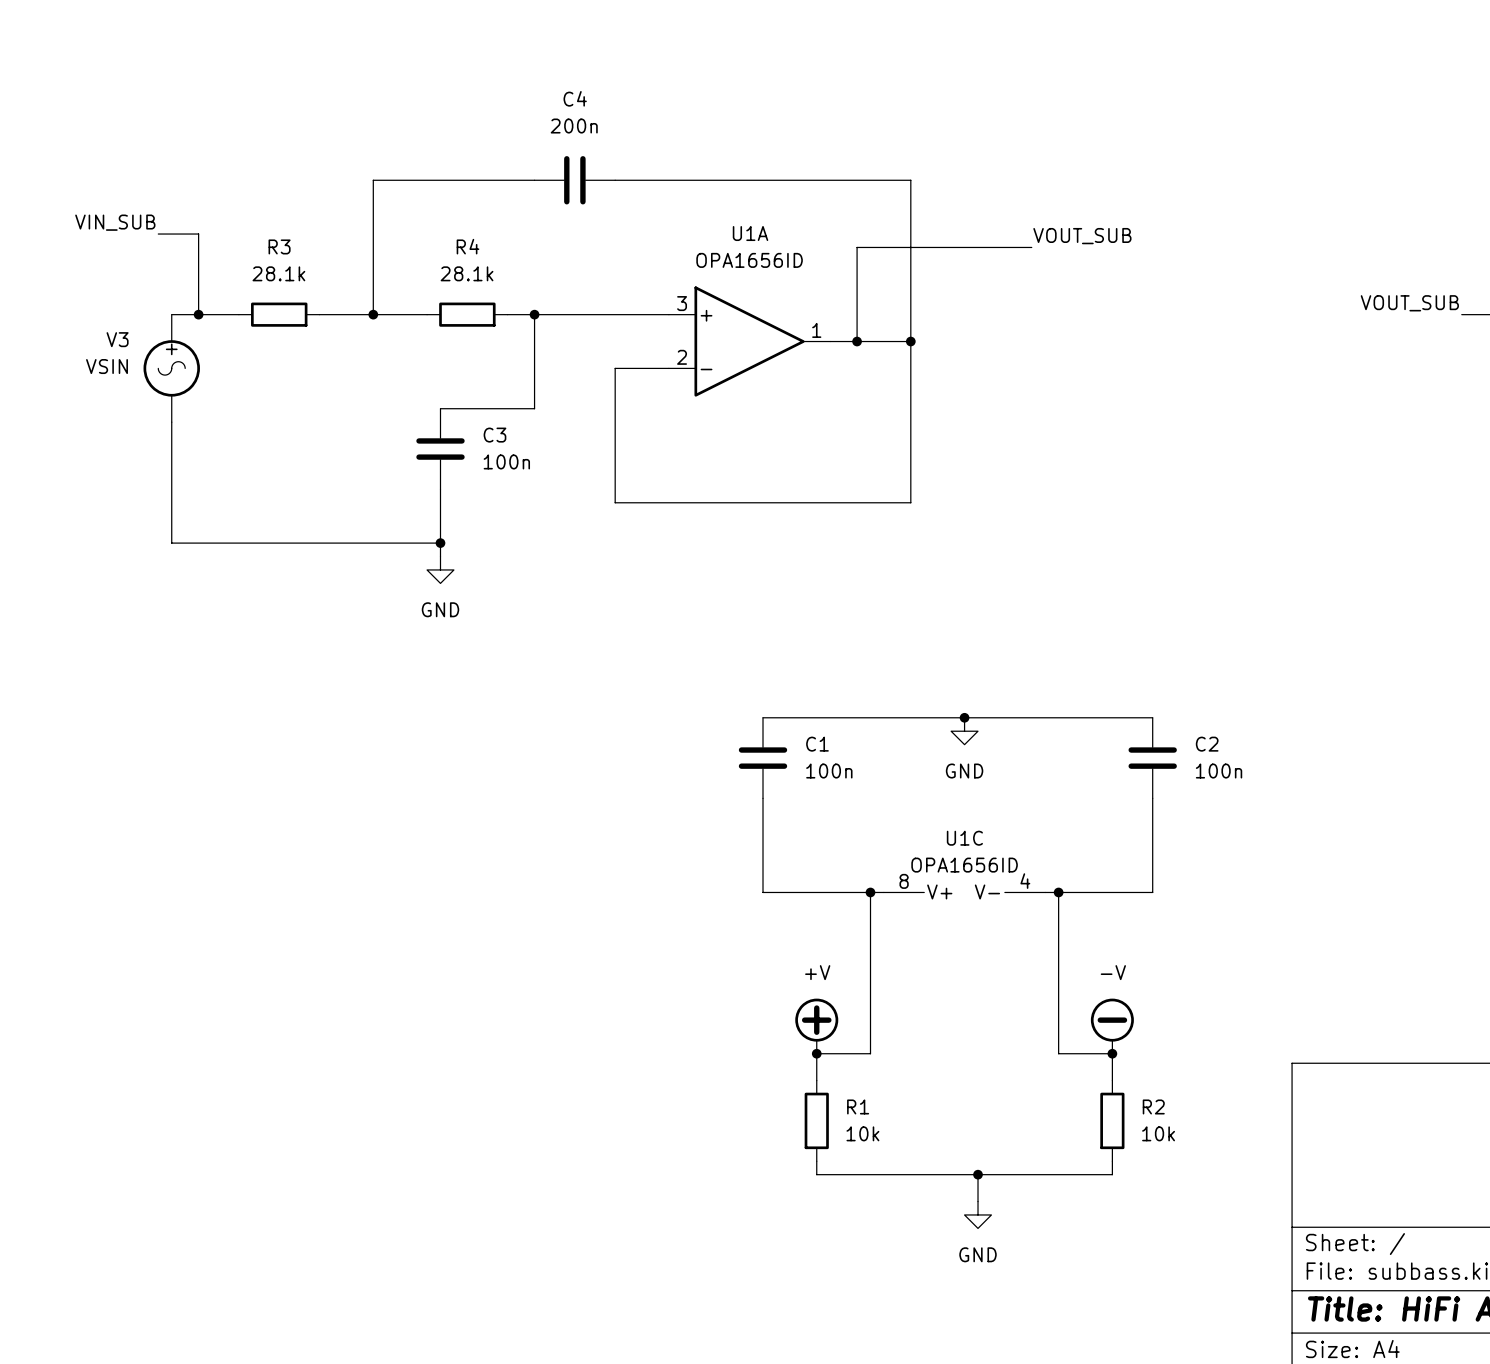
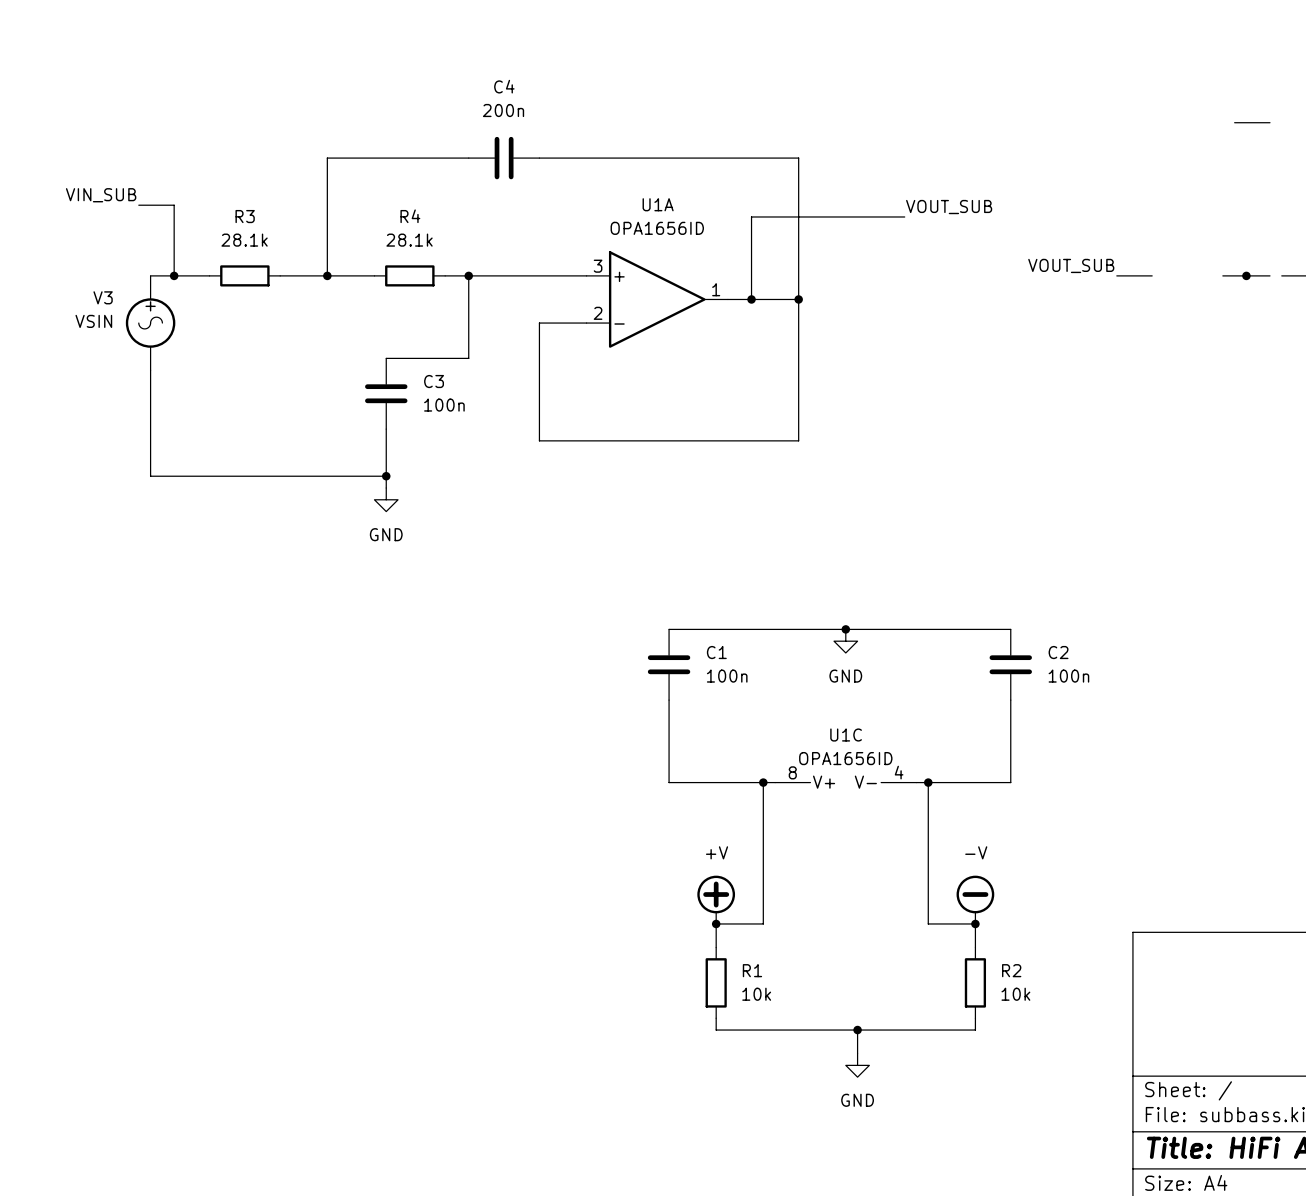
wire: none -> (1234, 122) (1269, 122)
label position: VOUT_SUB (1409, 303) -> VOUT_SUB (1071, 265)
wire: none -> (1116, 275) (1152, 275)
wire: none -> (1222, 275) (1269, 275)
junction: none -> (1246, 275)

